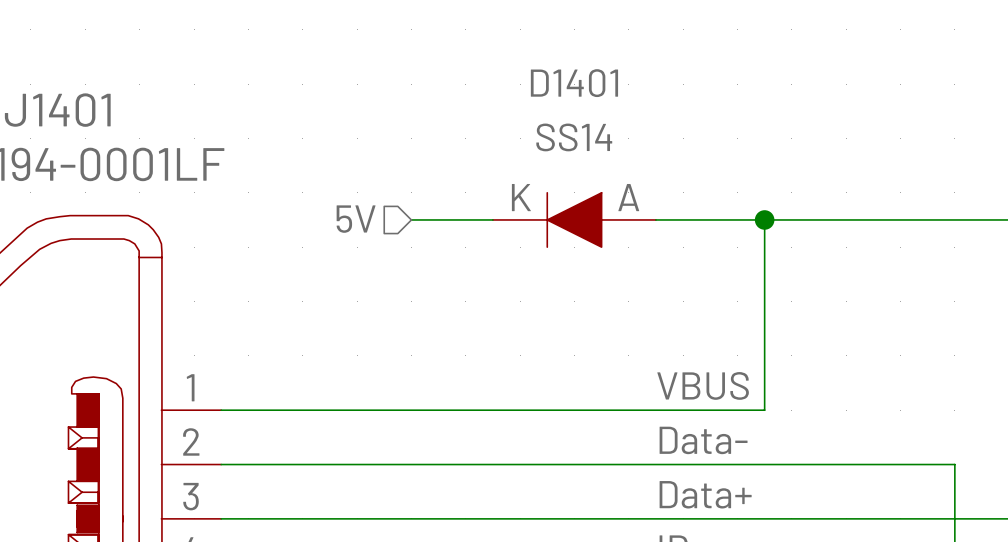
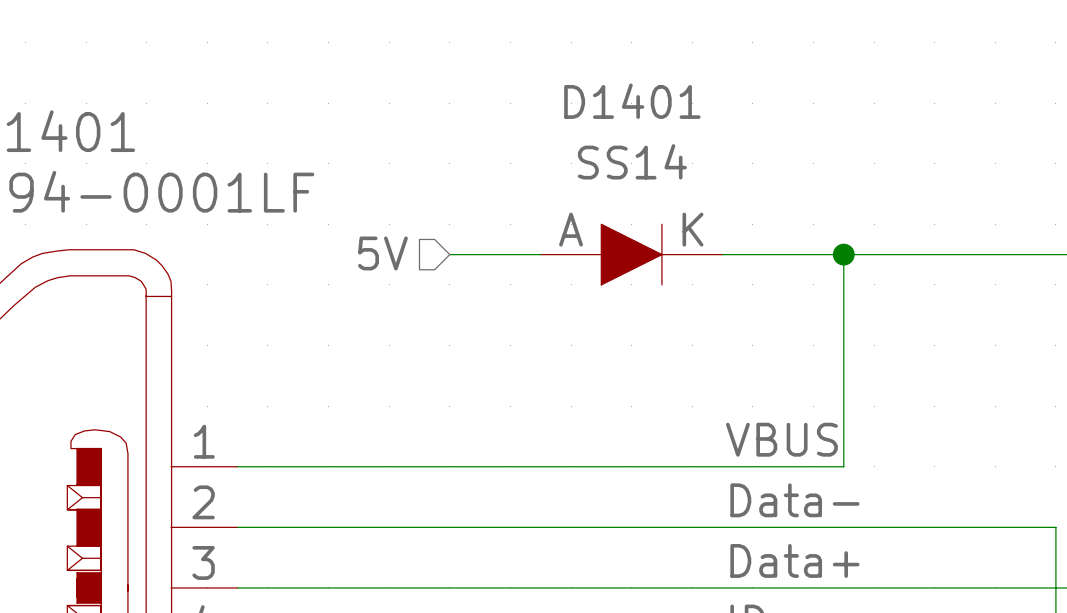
D1401 rotation: 0° (574, 219) -> 180° (631, 254)

